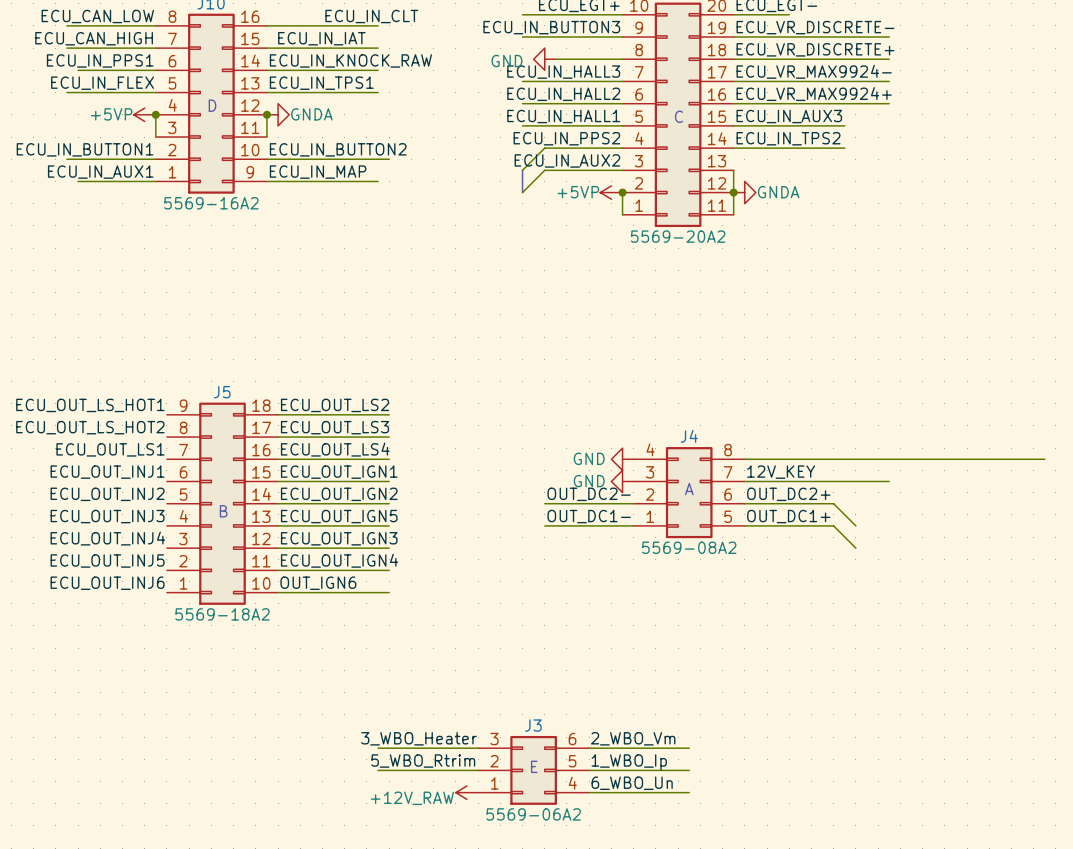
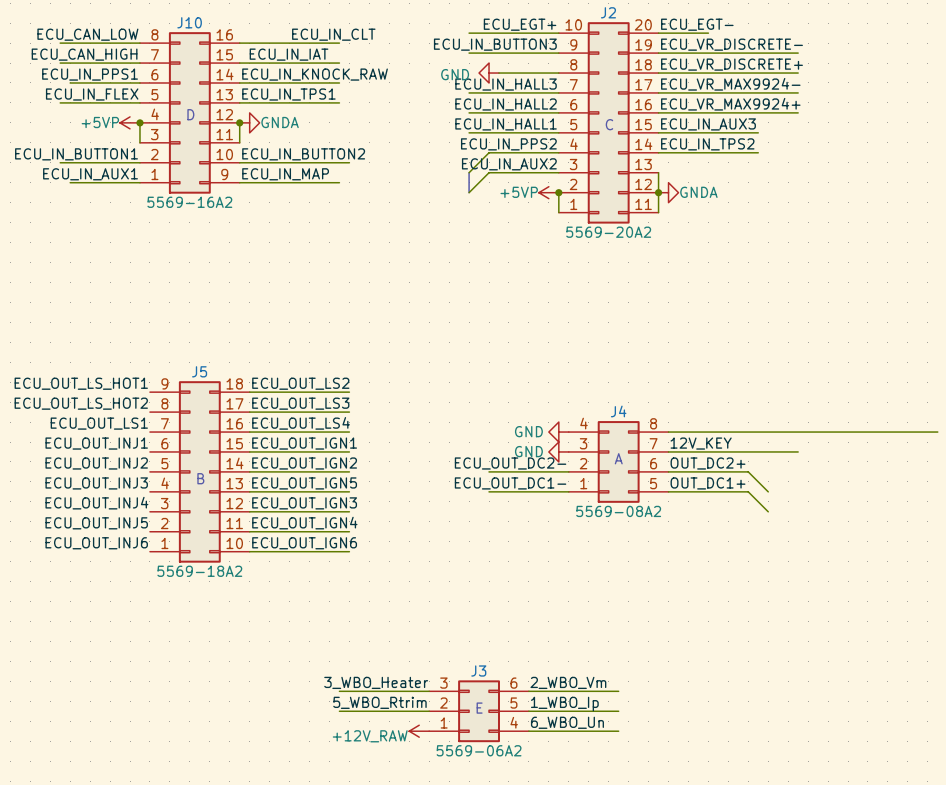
label: OUT_DC2- (589, 494) -> ECU_OUT_DC2- (510, 463)
label: OUT_DC1- (589, 516) -> ECU_OUT_DC1- (510, 483)
label: OUT_IGN6 (318, 583) -> ECU_OUT_IGN6 (304, 543)

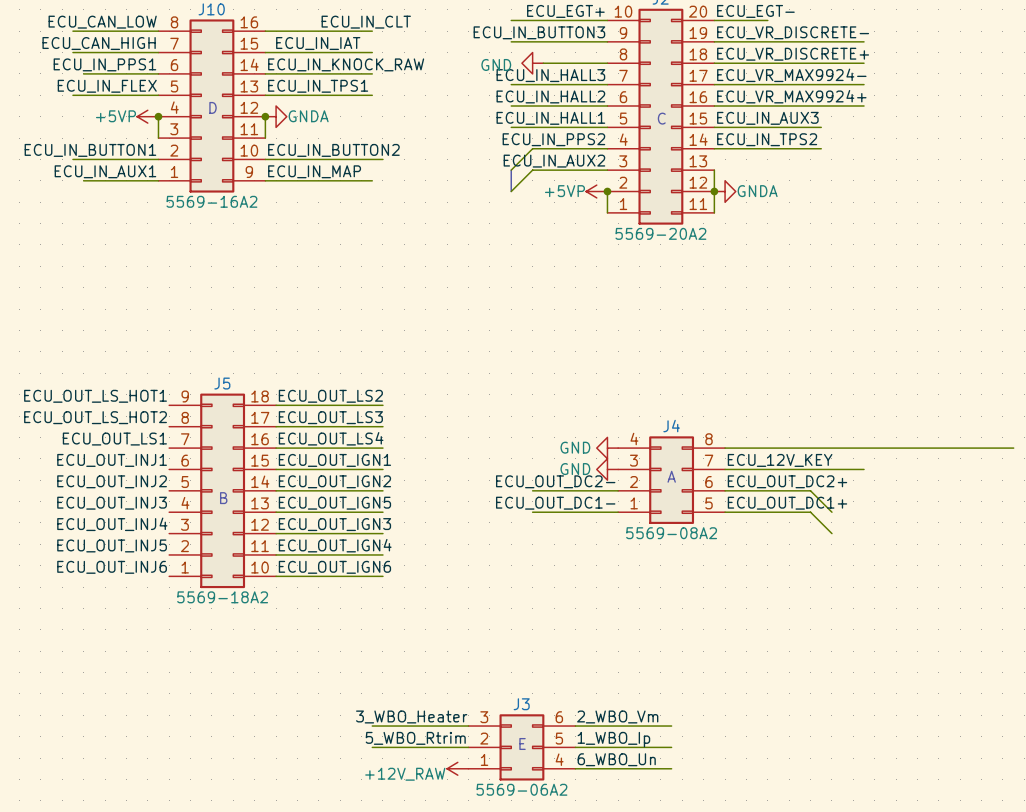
label: 12V_KEY (701, 443) -> ECU_12V_KEY (780, 460)
label: OUT_DC2+ (708, 463) -> ECU_OUT_DC2+ (787, 481)
label: OUT_DC1+ (708, 483) -> ECU_OUT_DC1+ (787, 503)

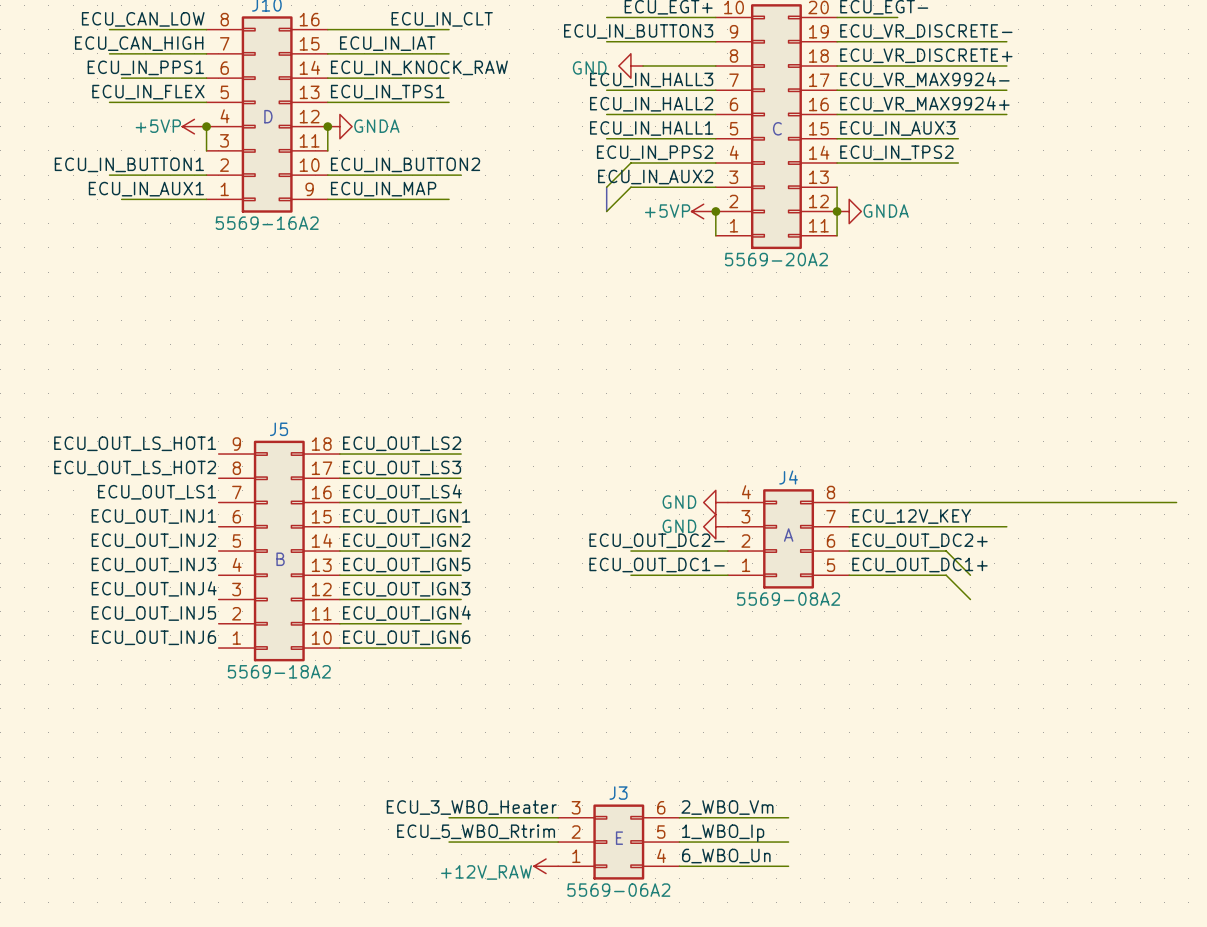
label: 3_WBO_Heater (411, 716) -> ECU_3_WBO_Heater (471, 807)
label: 5_WBO_Rtrim (415, 738) -> ECU_5_WBO_Rtrim (476, 831)

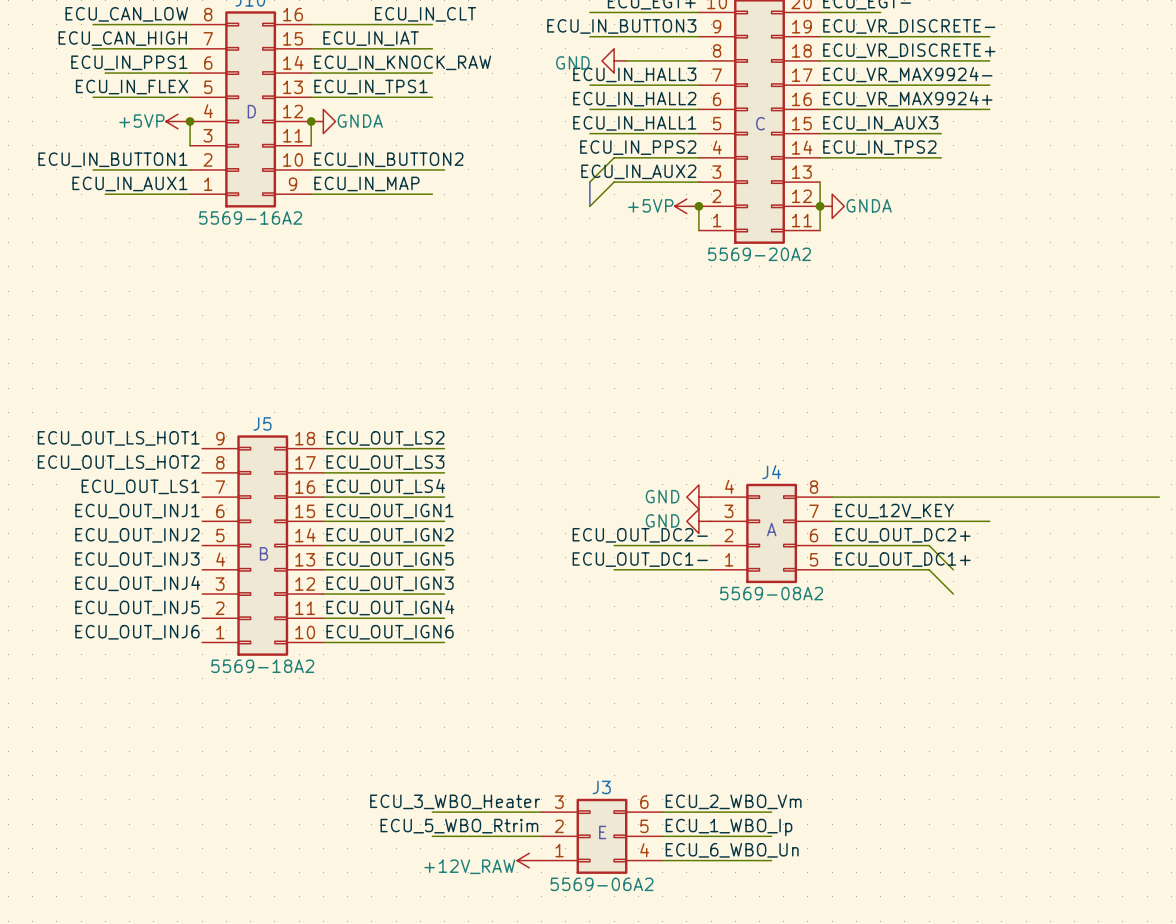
label: 2_WBO_Vm (727, 807) -> ECU_2_WBO_Vm (733, 801)
label: 1_WBO_Ip (723, 833) -> ECU_1_WBO_Ip (729, 827)
label: 6_WBO_Un (726, 856) -> ECU_6_WBO_Un (732, 850)

